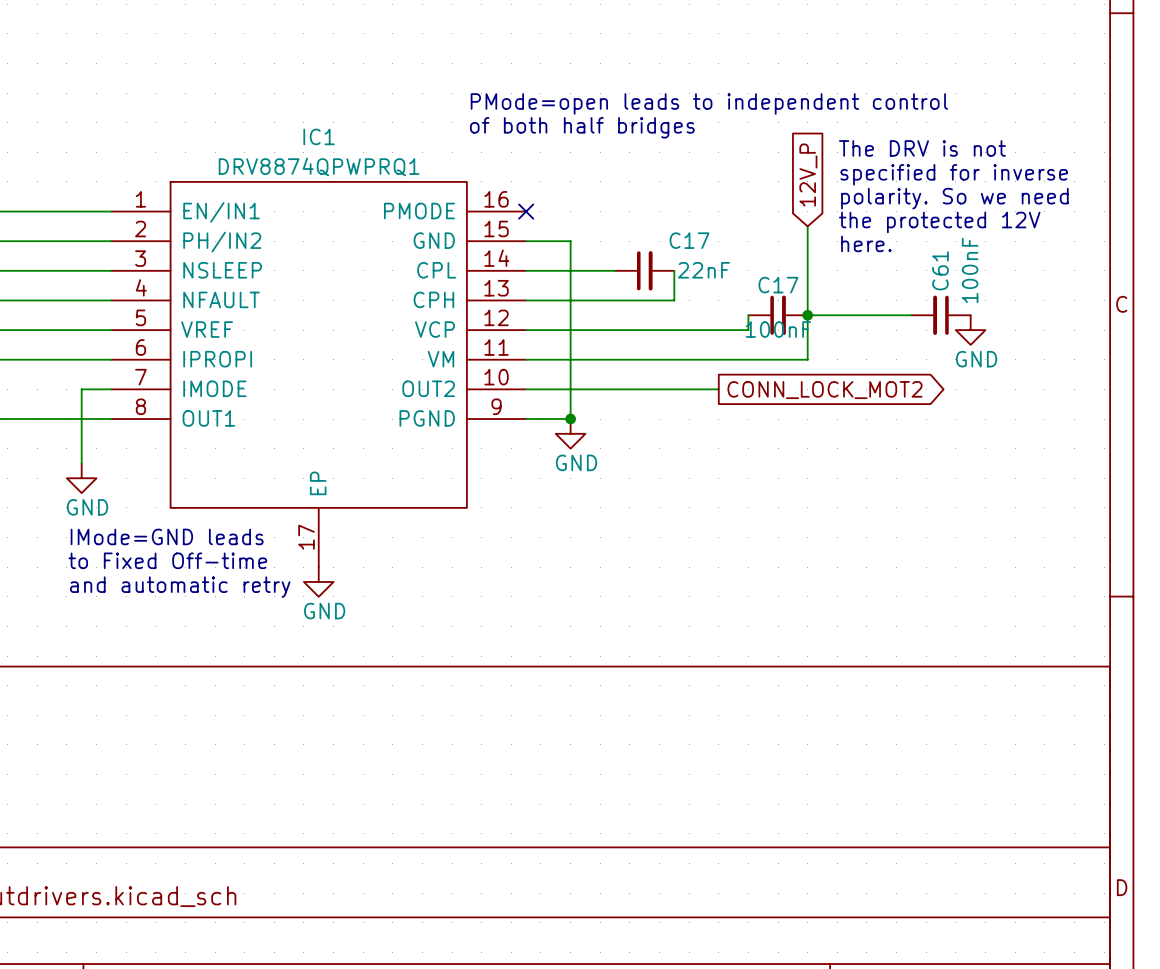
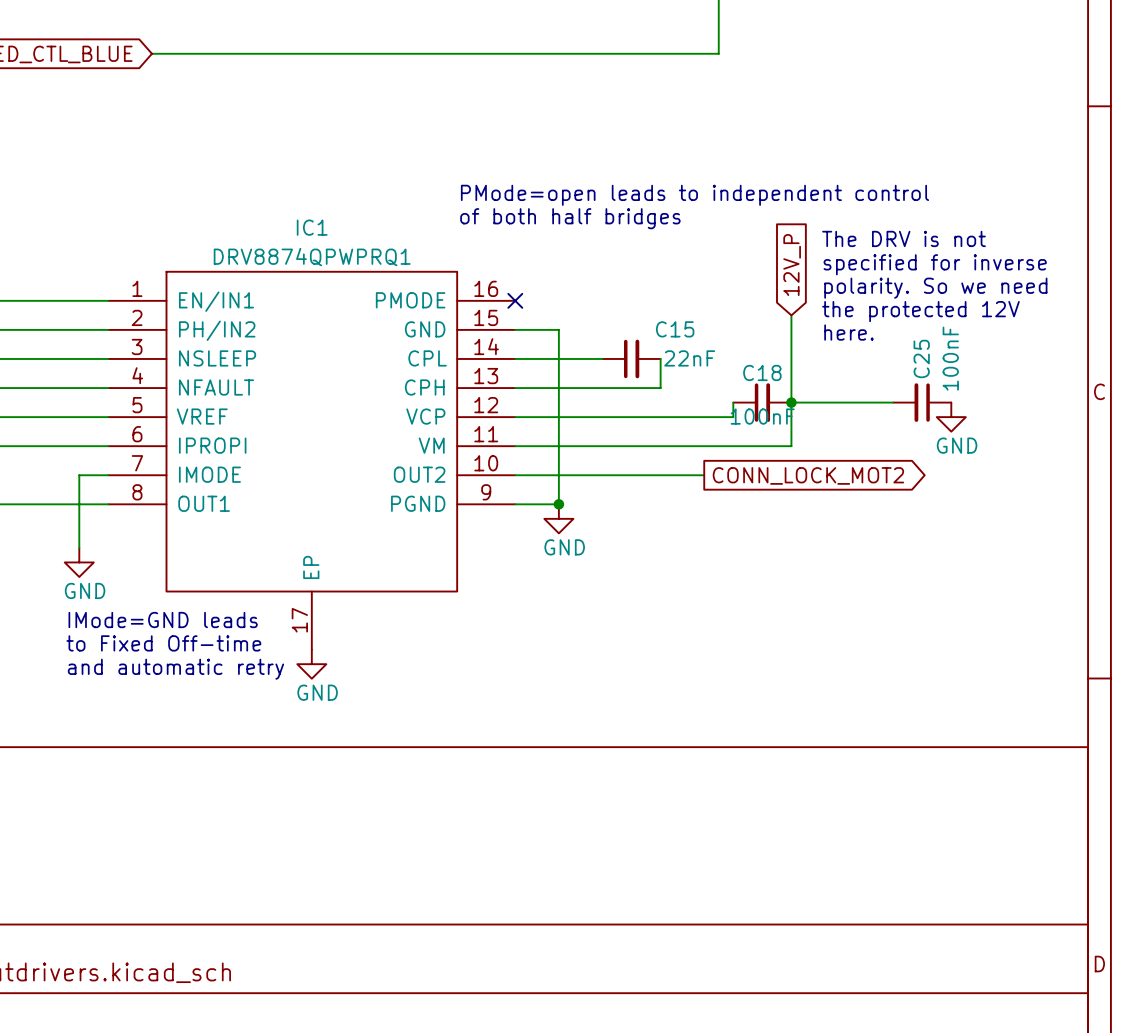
C17 name: C17 (689, 240) -> C15 (675, 329)
C61 name: C61 (940, 270) -> C25 (921, 358)
C17 name: C17 (778, 285) -> C18 (762, 372)

